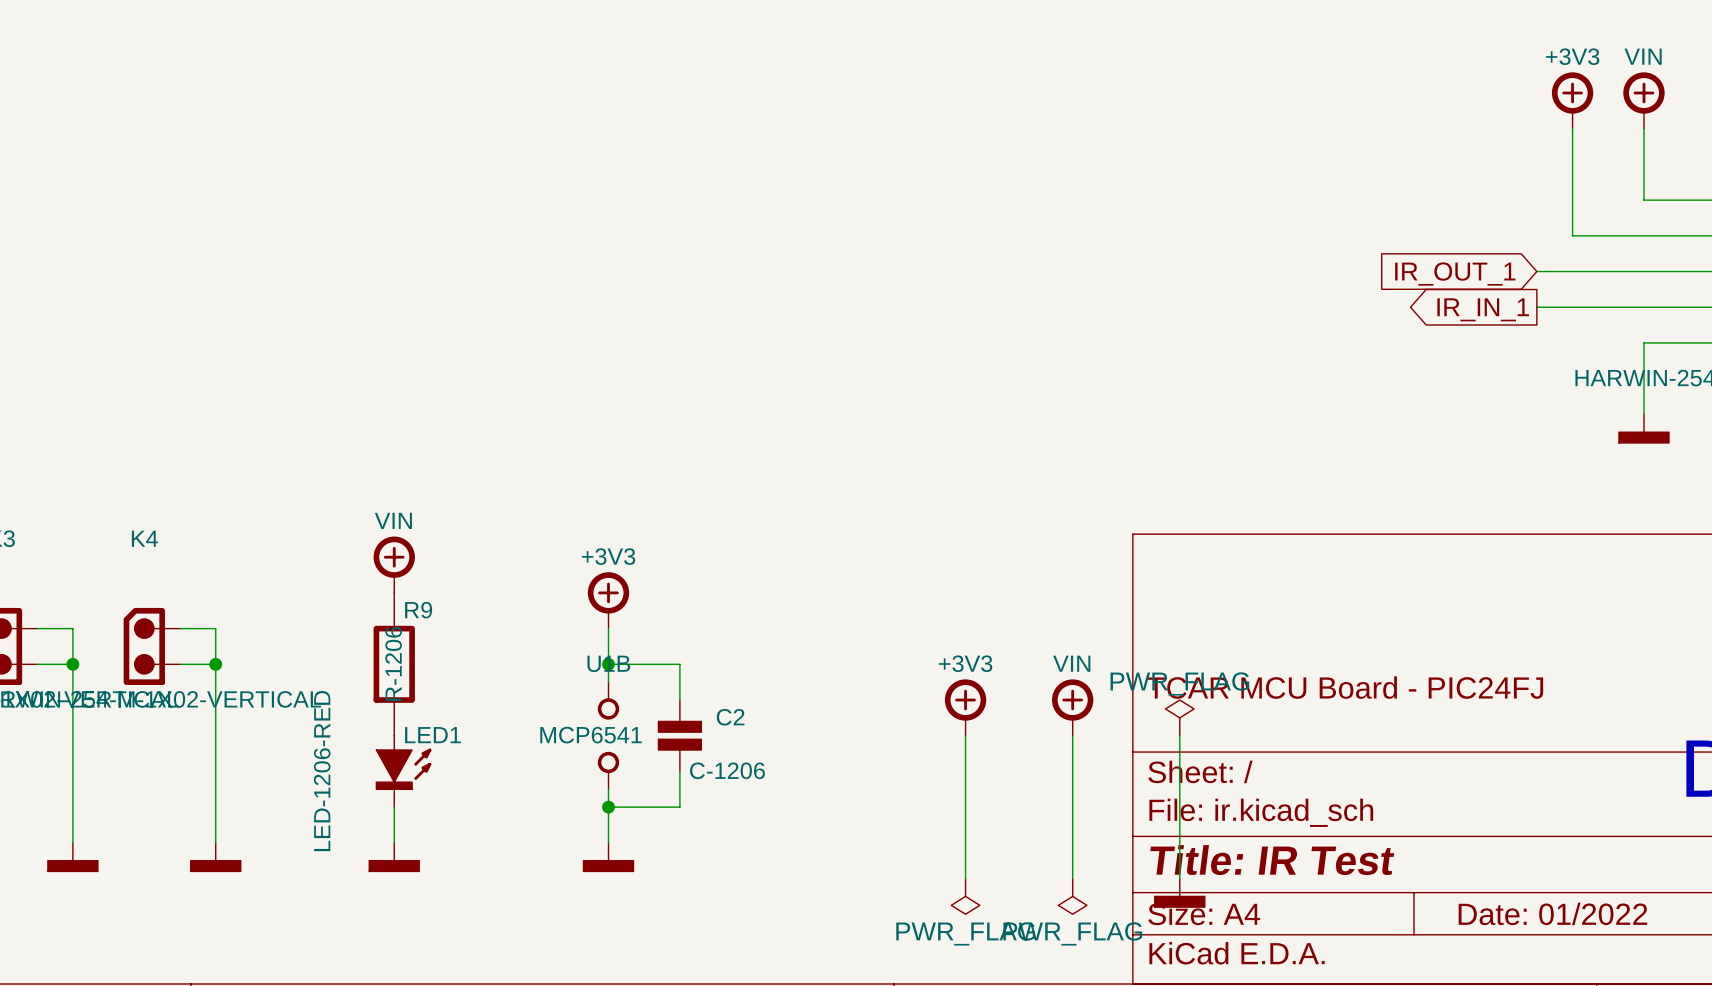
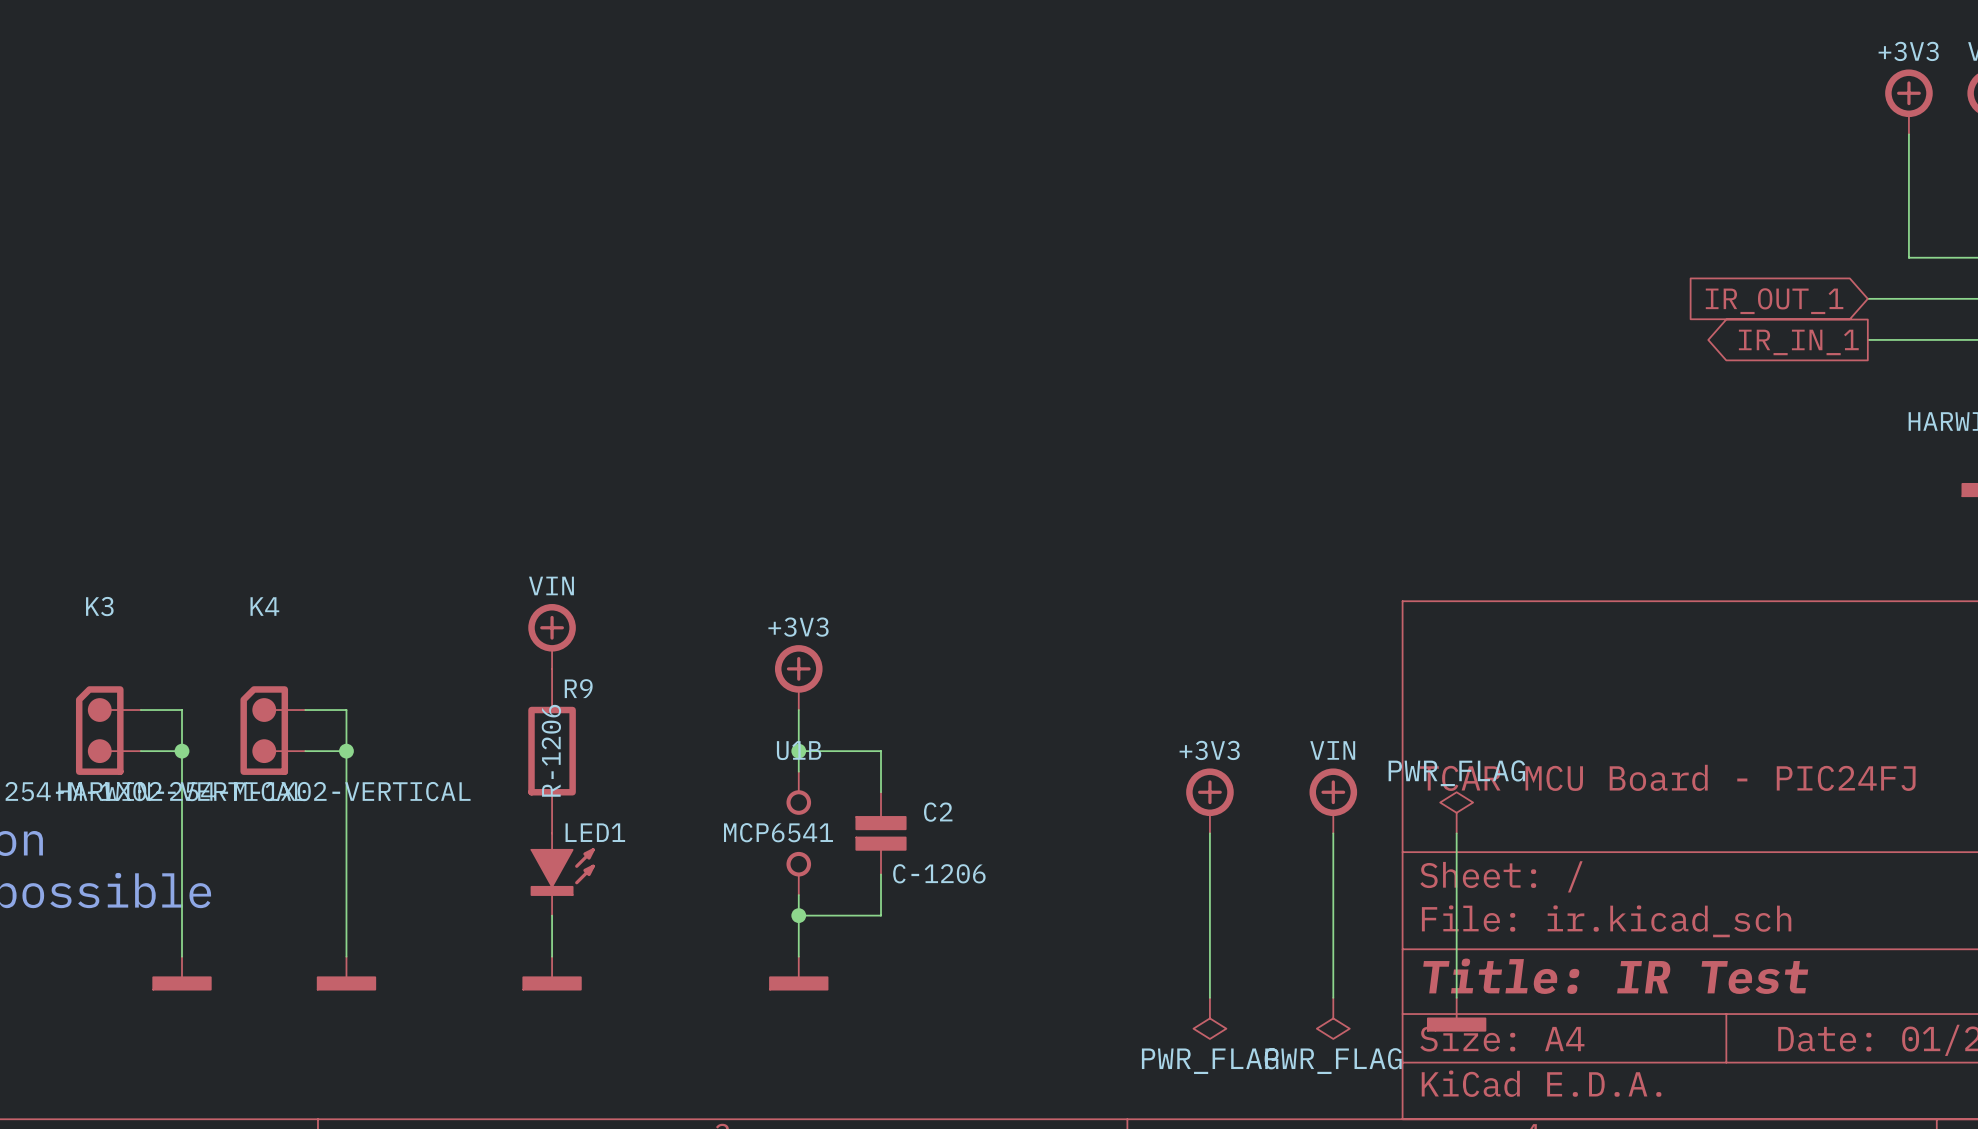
LED1 value: LED-1206-RED (322, 771) -> none

